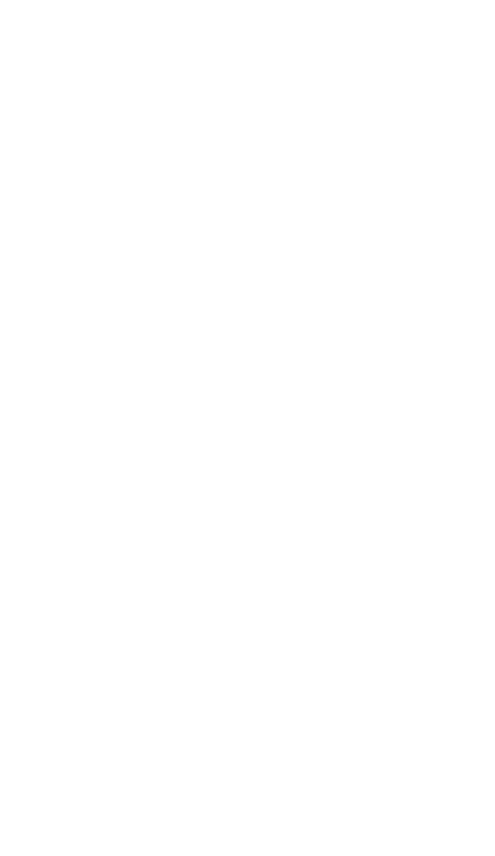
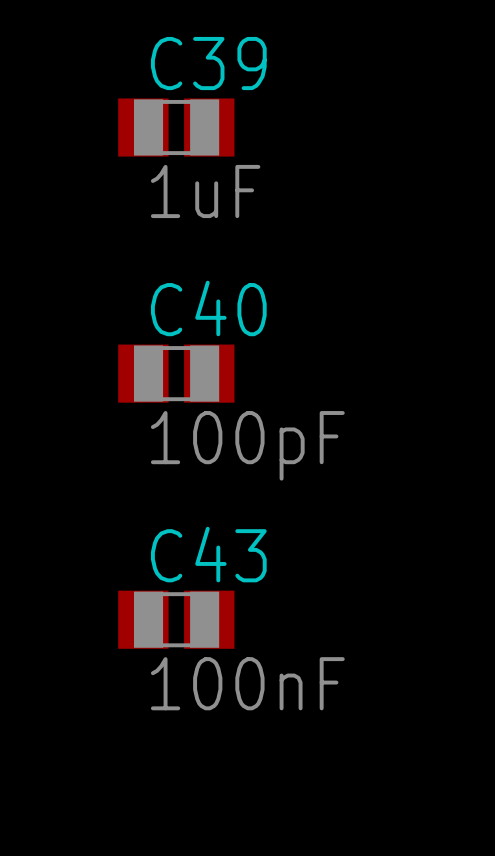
C39: none -> 1uF (176, 127)
C40: none -> 100pF (176, 373)
C43: none -> 100nF (176, 619)

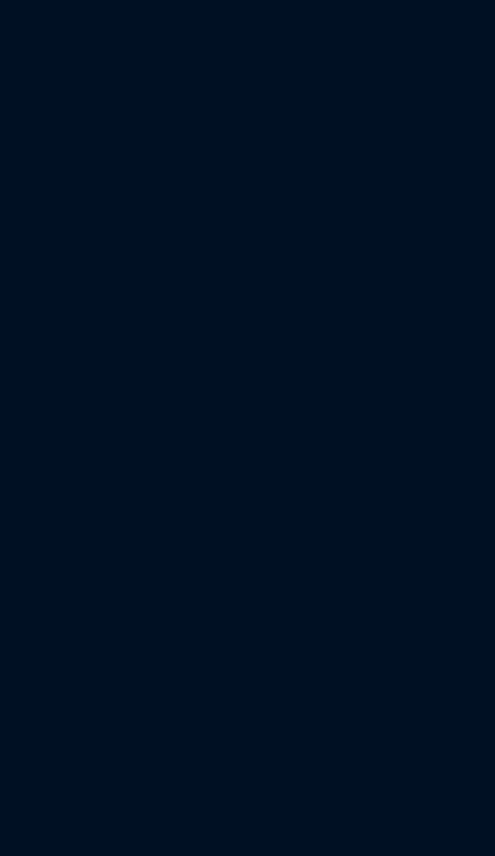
C39: 1uF (176, 127) -> none
C40: 100pF (176, 373) -> none
C43: 100nF (176, 619) -> none

